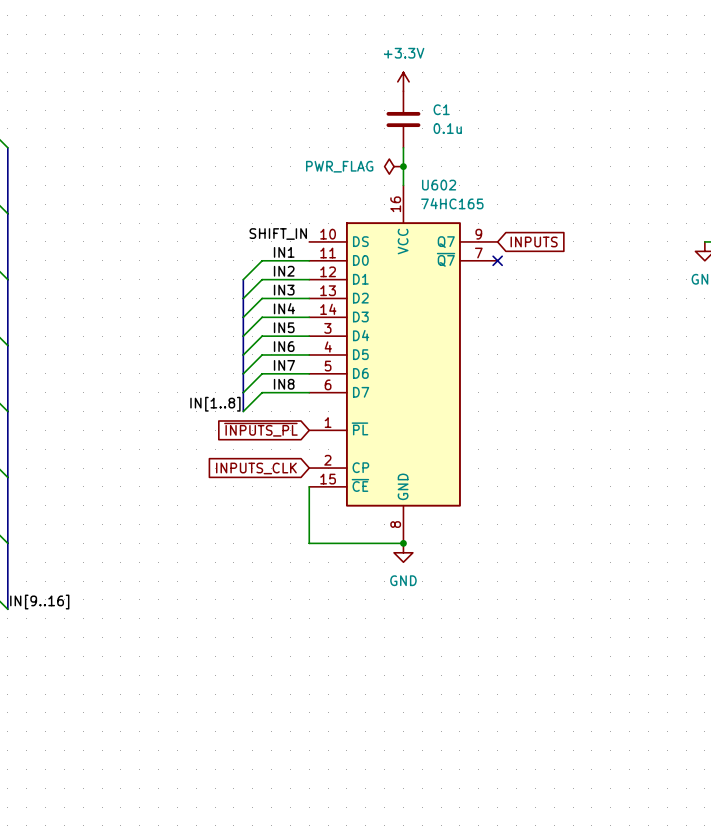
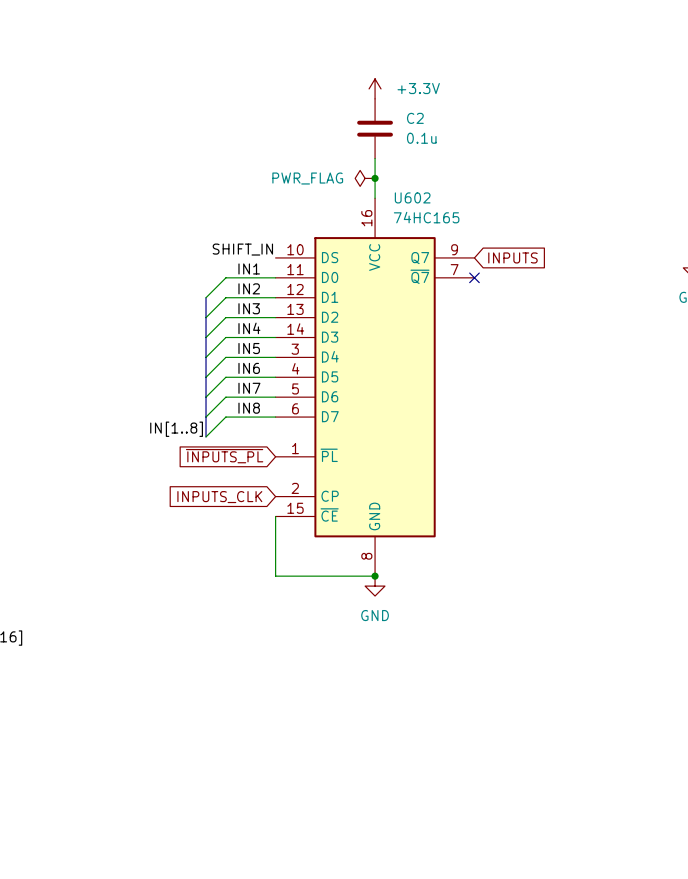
power symbol text position: +3.3V (404, 53) -> +3.3V (418, 88)
C1 name: C1 (441, 109) -> C2 (415, 118)

